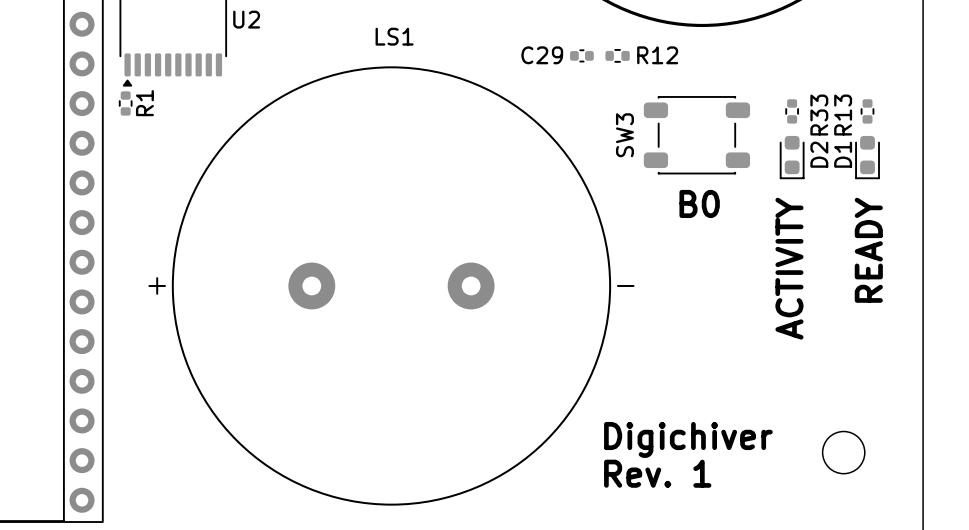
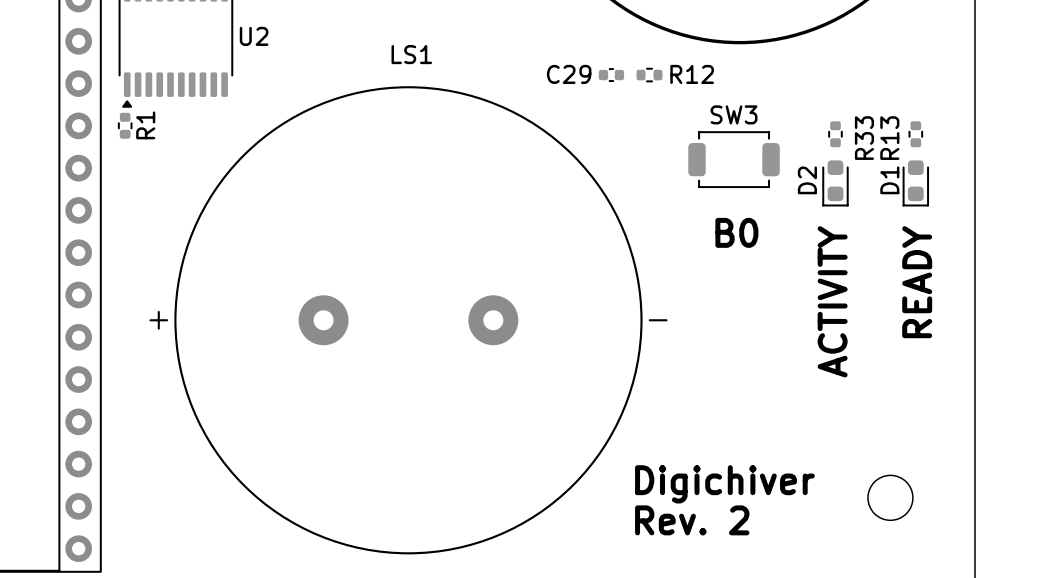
SW3 footprint: [643, 96, 751, 175] -> [688, 131, 780, 189]
SW3 name position: SW3 (624, 135) -> SW3 (734, 114)
D2 name position: D2 (819, 154) -> D2 (807, 180)
text: Rev. 1 (657, 473) -> Rev. 2 (692, 520)

